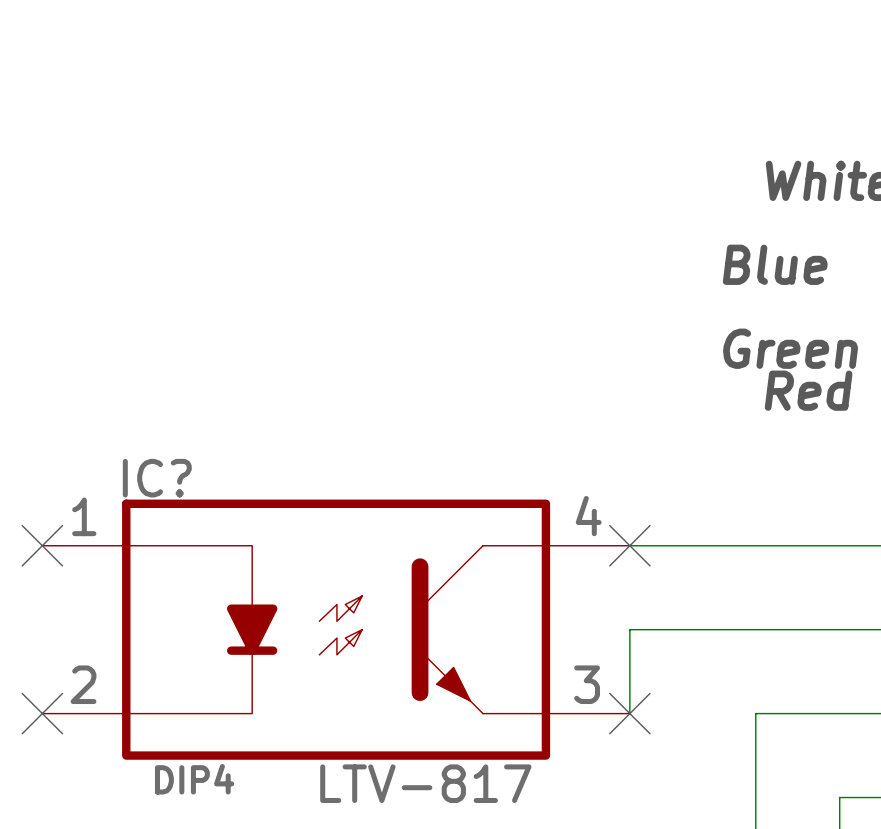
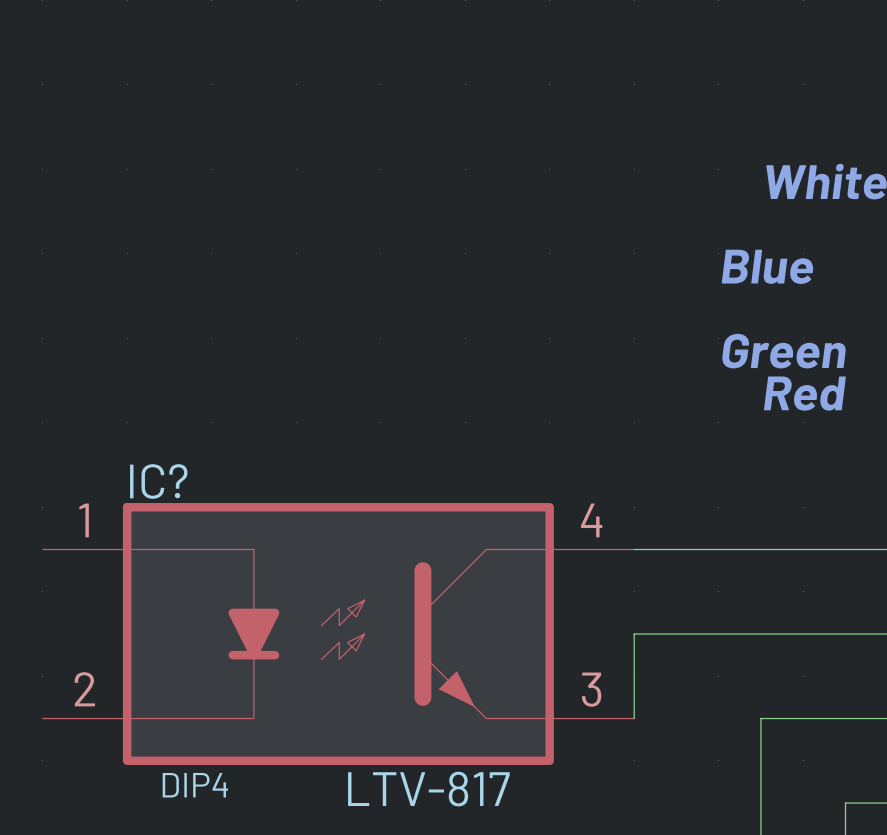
no-connect mark: (42, 545) -> none
no-connect mark: (629, 545) -> none
no-connect mark: (42, 713) -> none
no-connect mark: (629, 713) -> none

